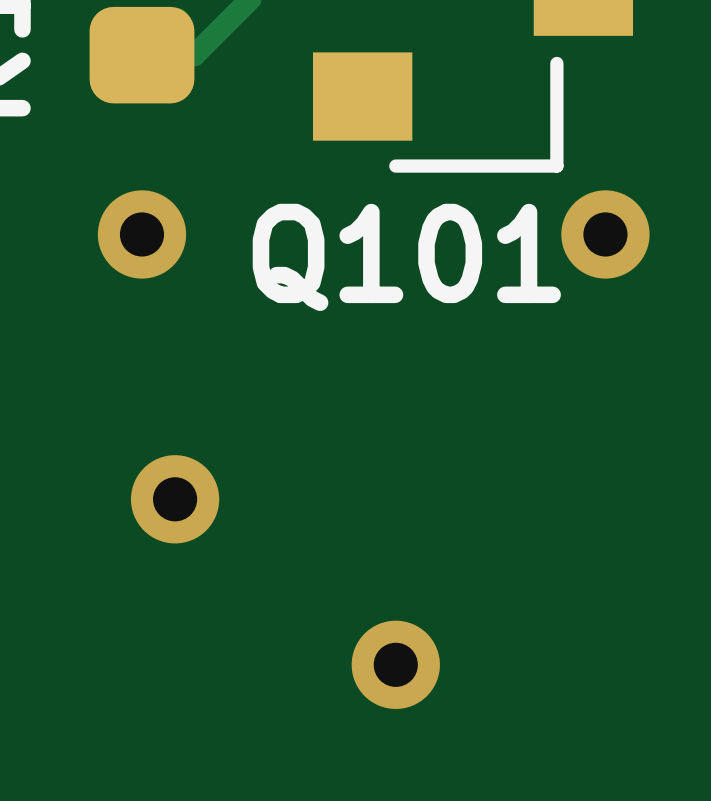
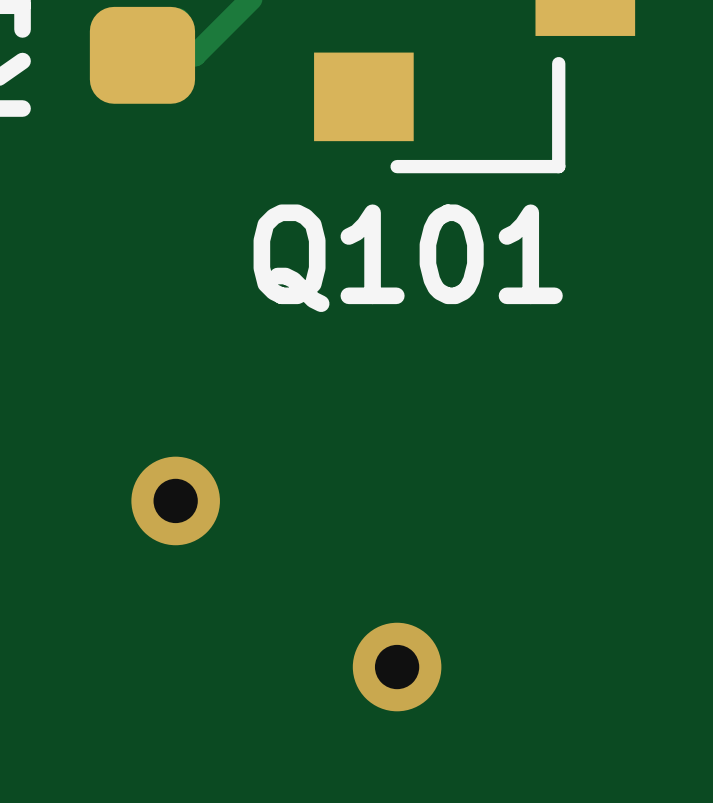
via: (141, 234) -> none
via: (605, 234) -> none

